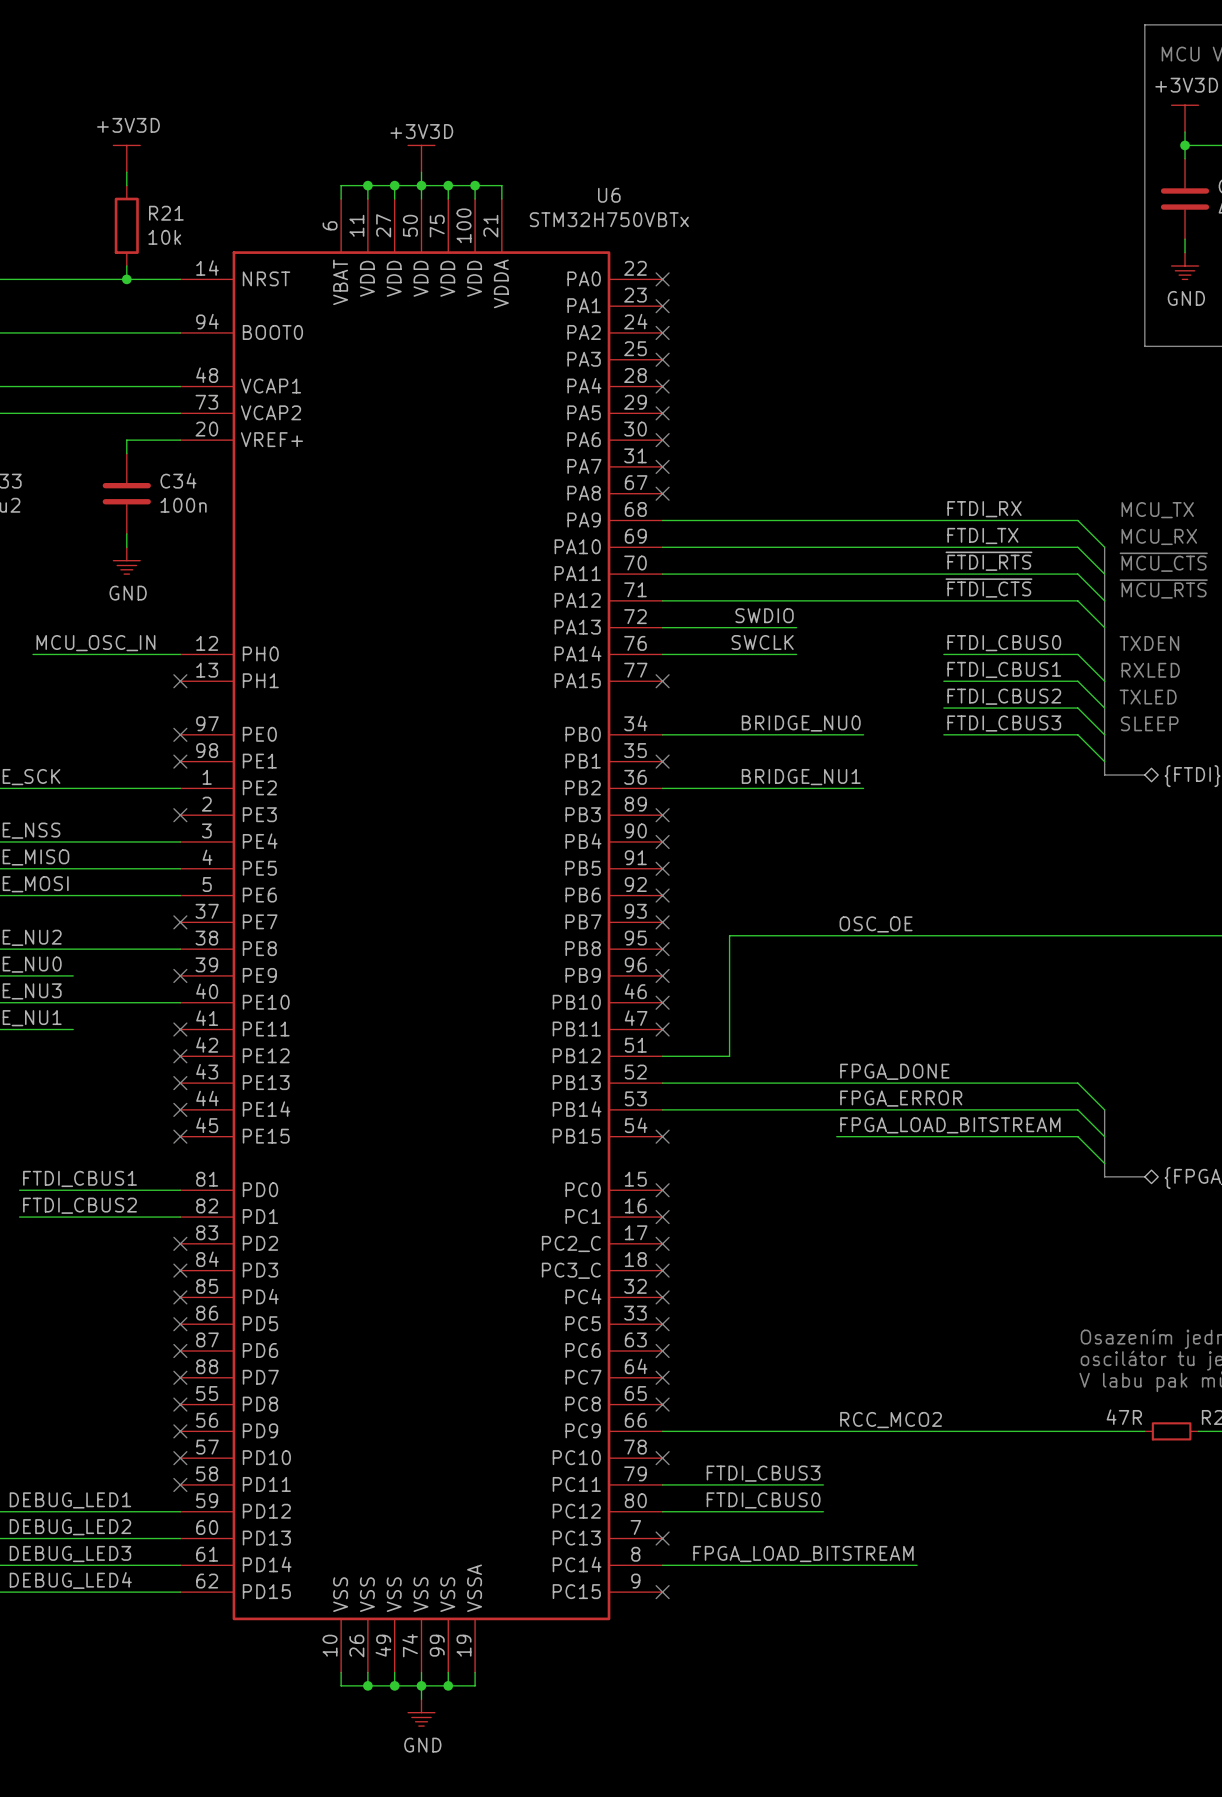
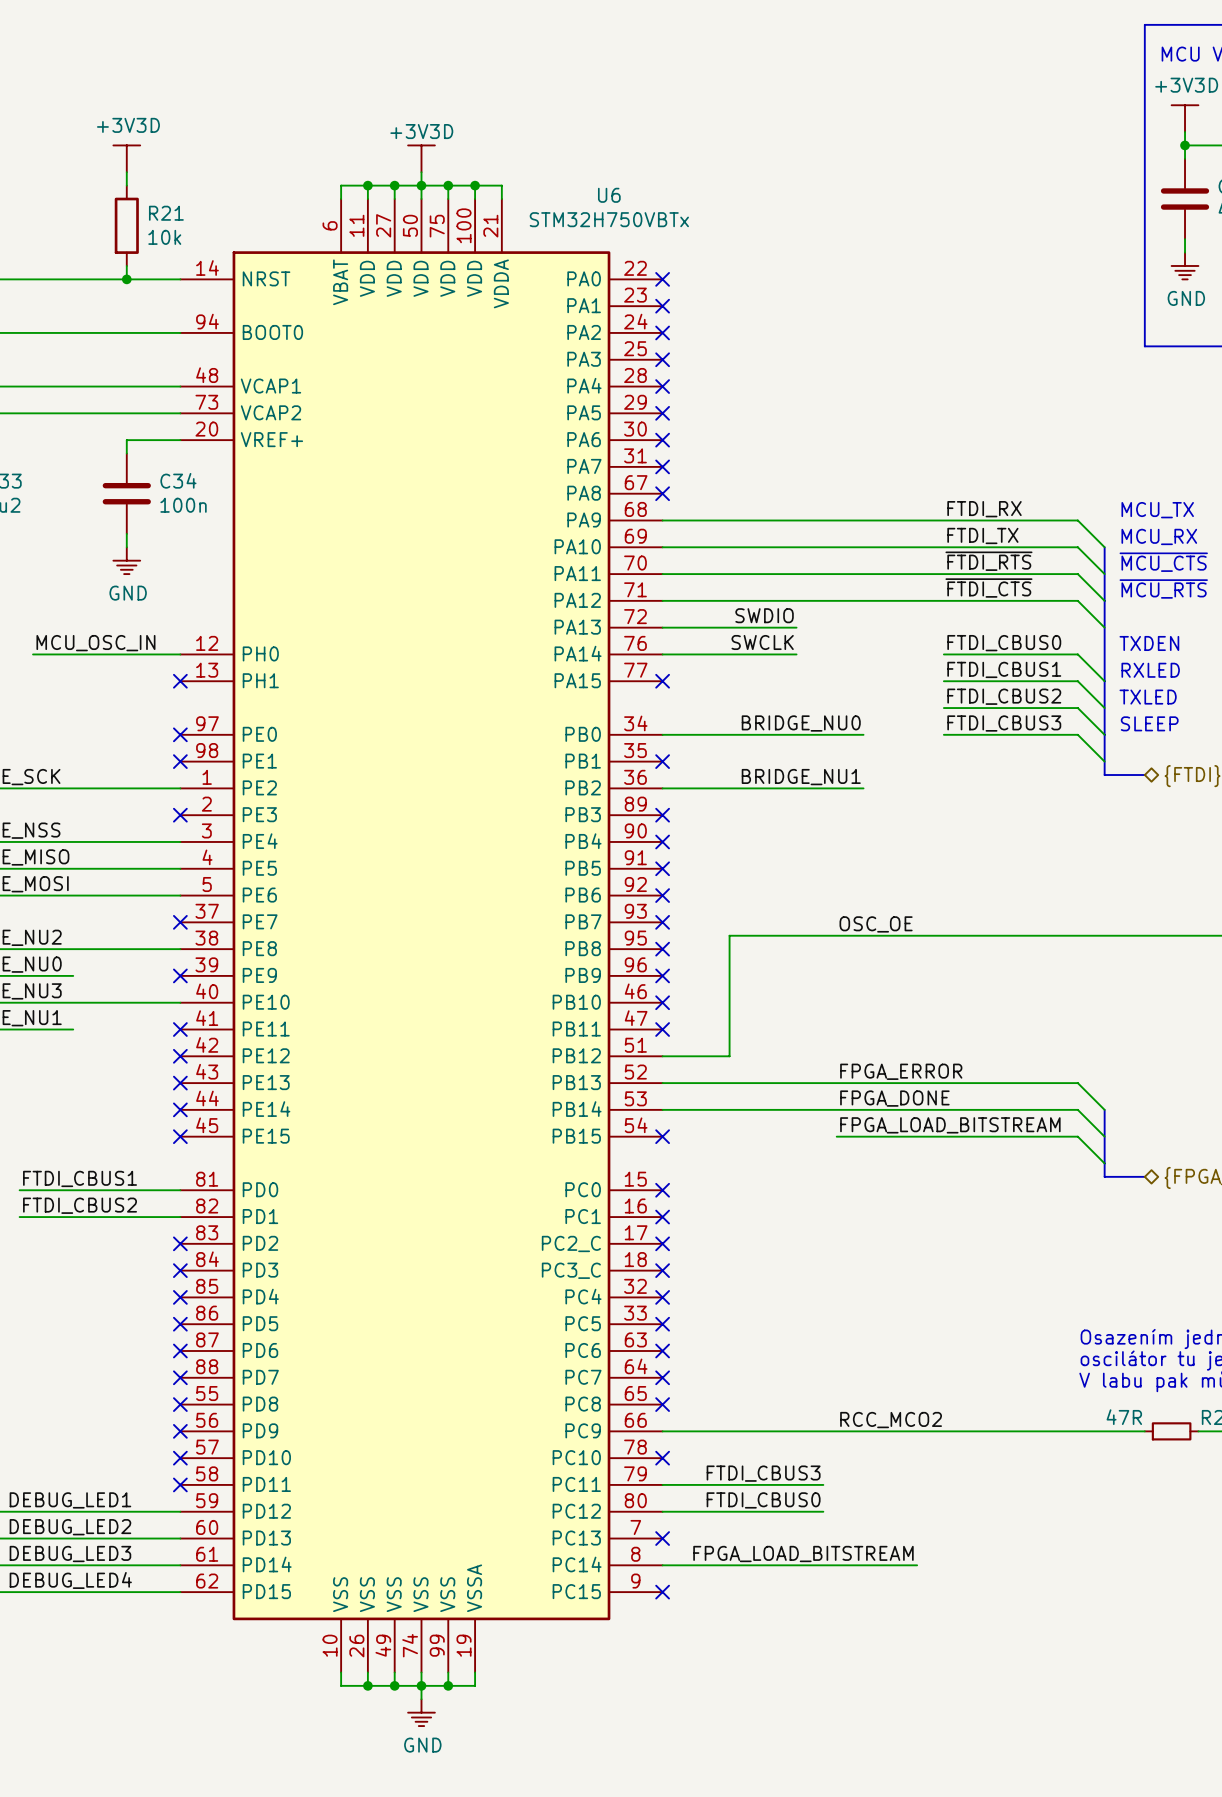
label: FPGA_DONE (894, 1071) -> FPGA_ERROR (901, 1071)
label: FPGA_ERROR (901, 1098) -> FPGA_DONE (894, 1098)

